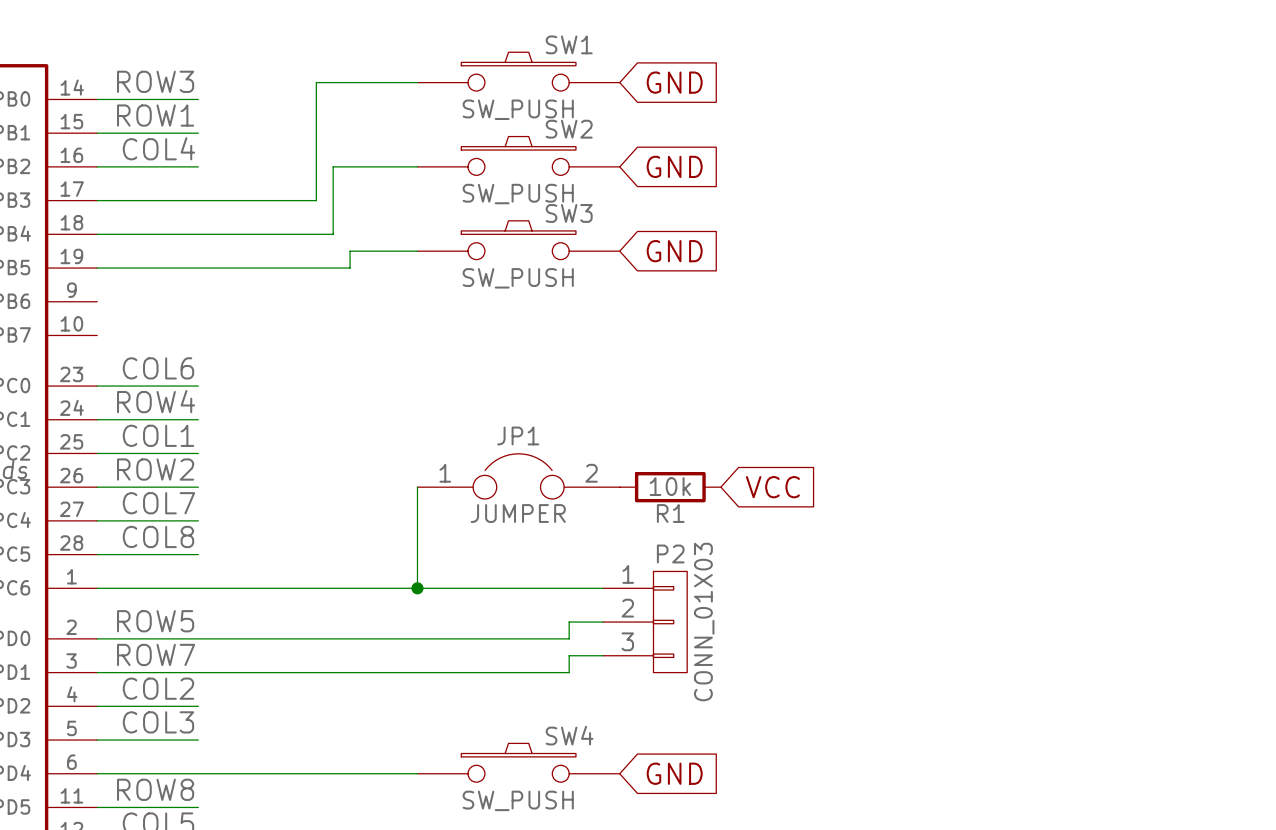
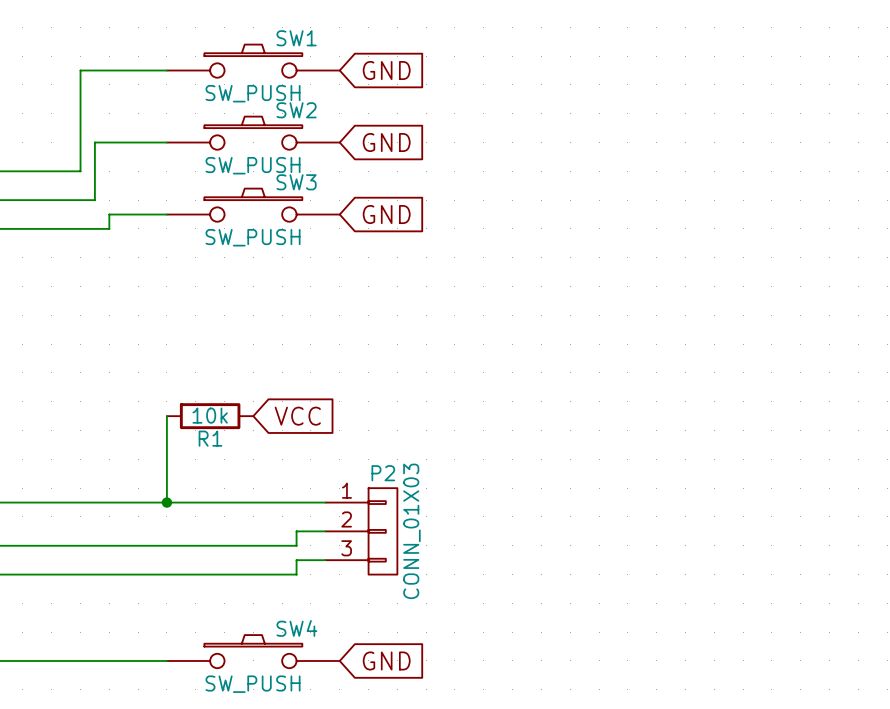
JP1: JUMPER (518, 476) -> none
R1 position: (670, 487) -> (210, 416)
global label position: VCC (772, 487) -> VCC (297, 416)

